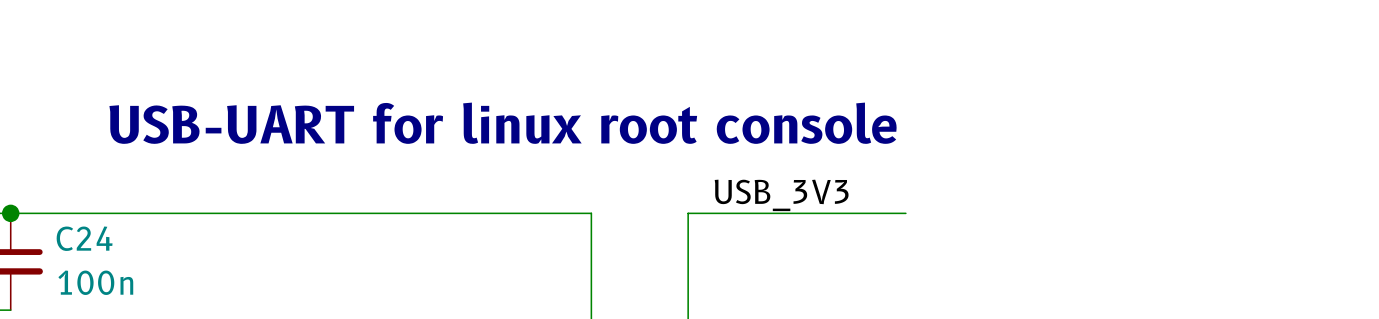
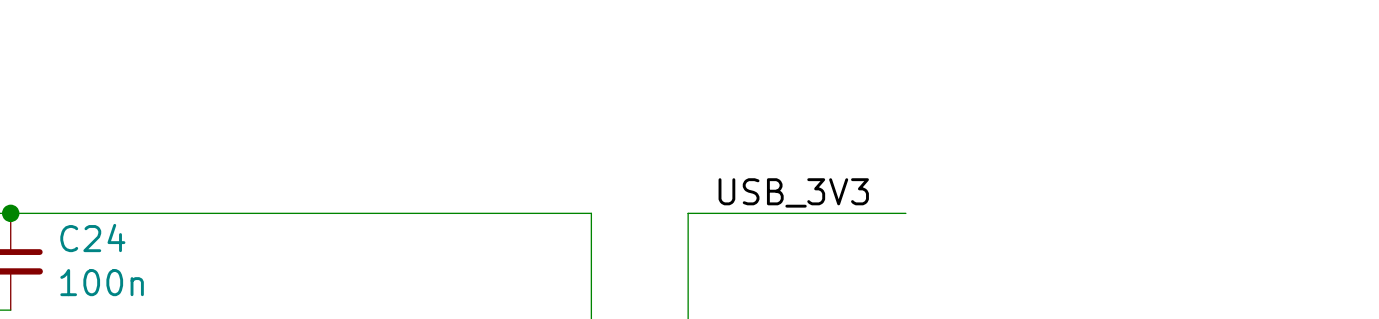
text: USB-UART for linux root console (503, 123) -> none

